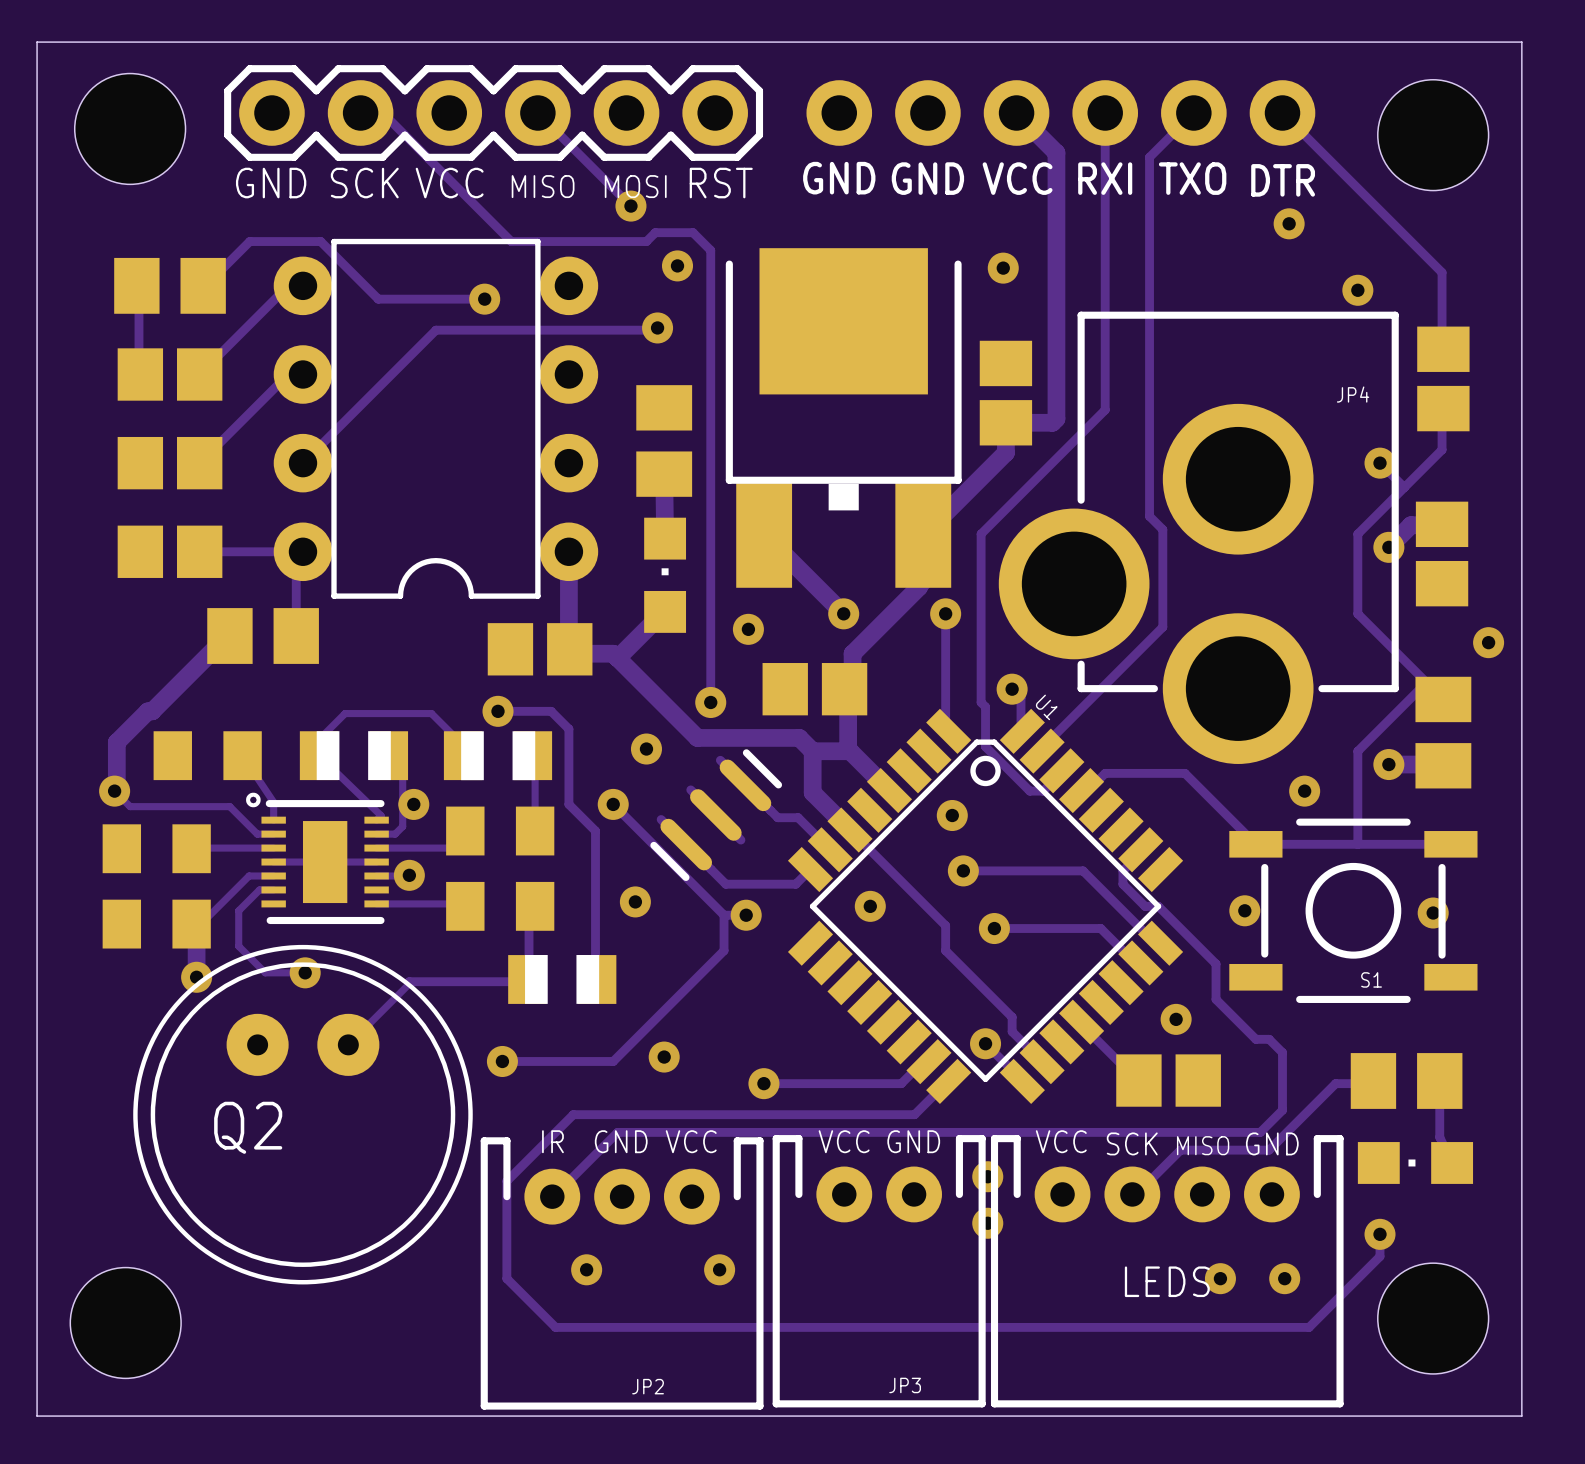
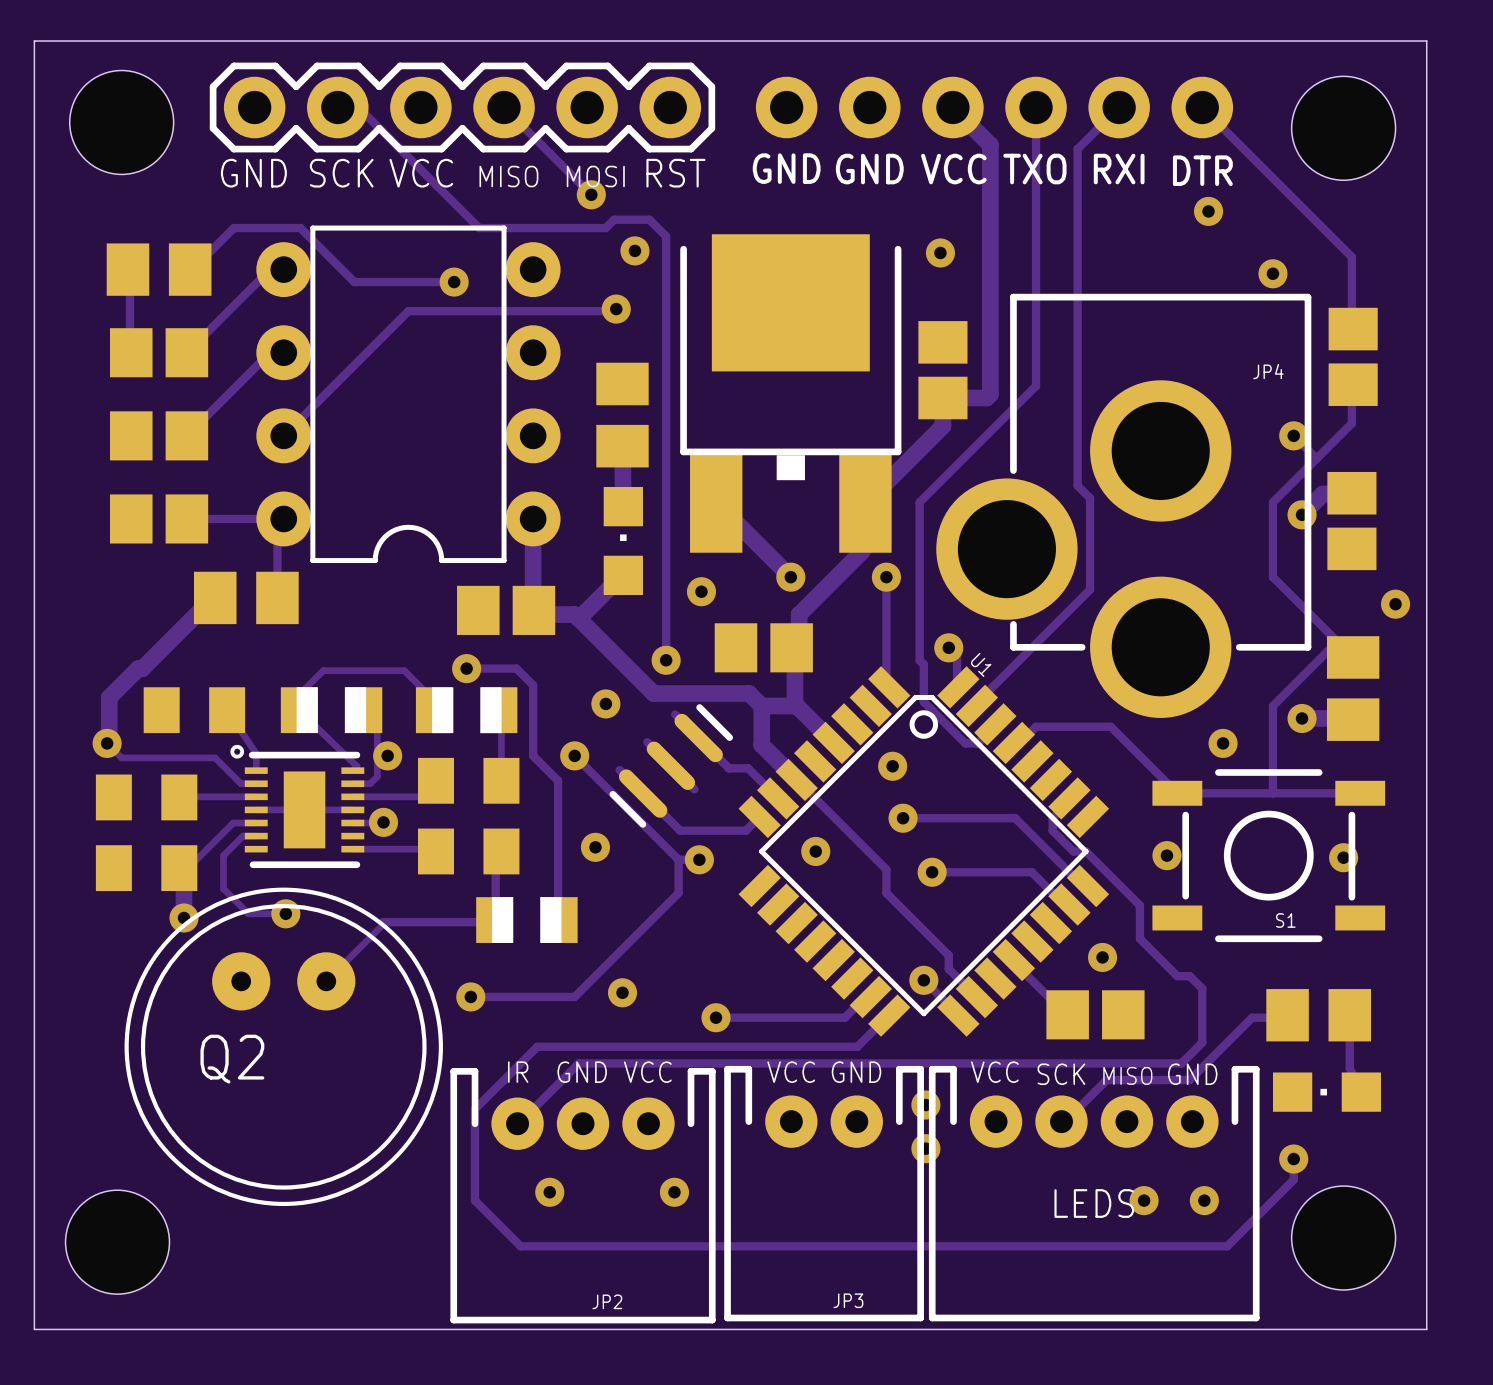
text: RXI (1105, 178) -> TXO (1034, 169)
text: TXO (1192, 178) -> RXI (1119, 169)

